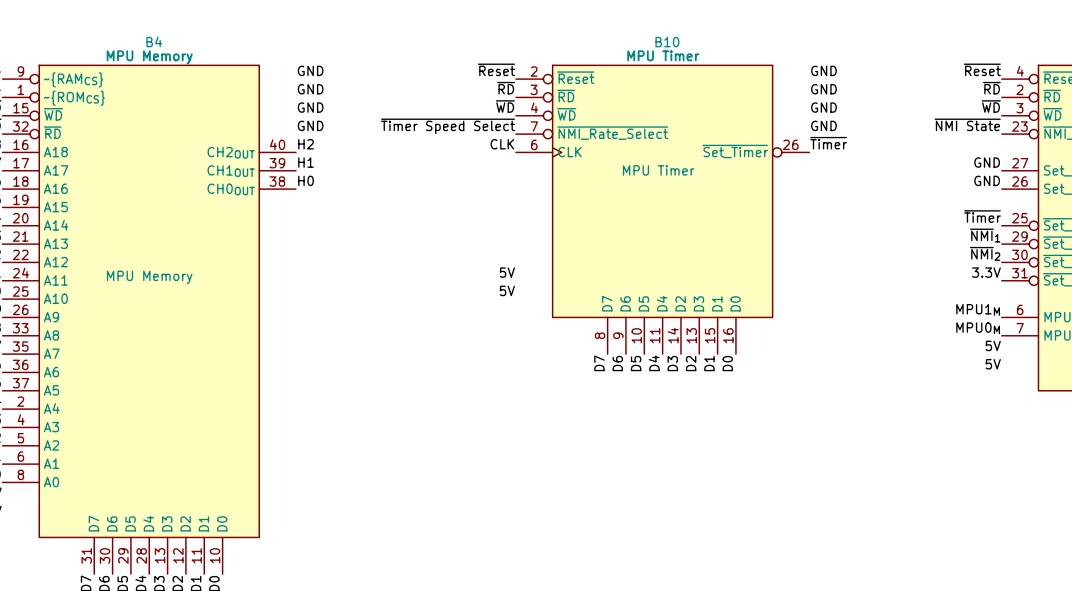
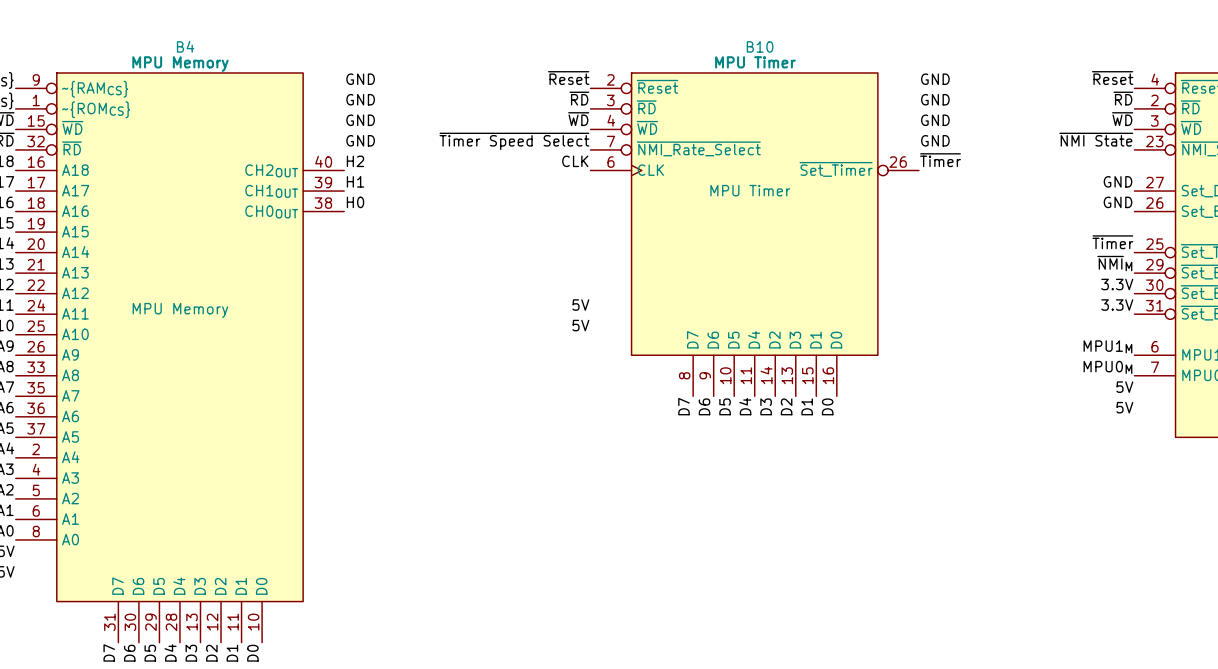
label: ~{NMI}1 (985, 235) -> ~{NMI}M (1114, 263)
label: ~{NMI}2 (985, 253) -> 3.3V (1117, 284)

